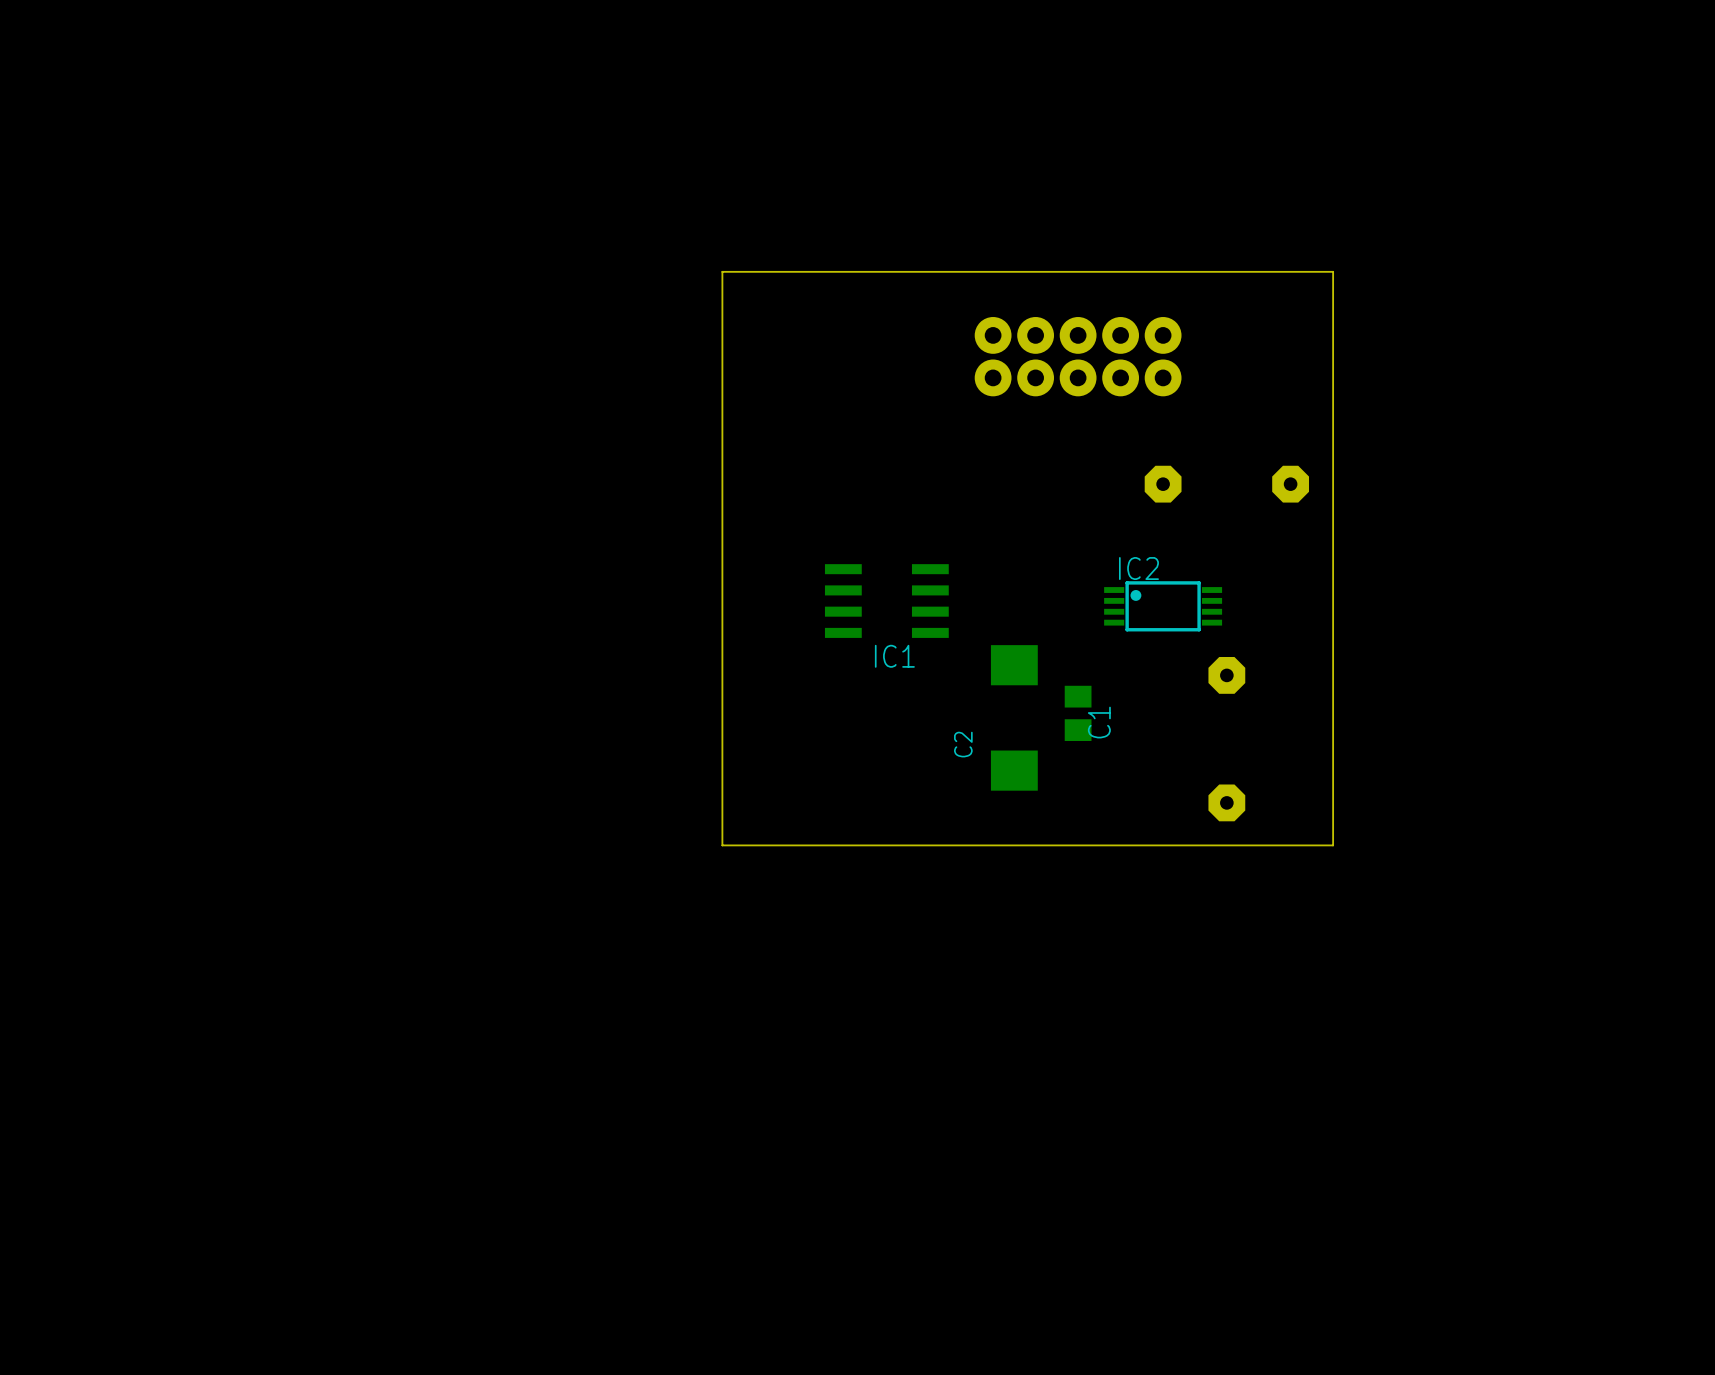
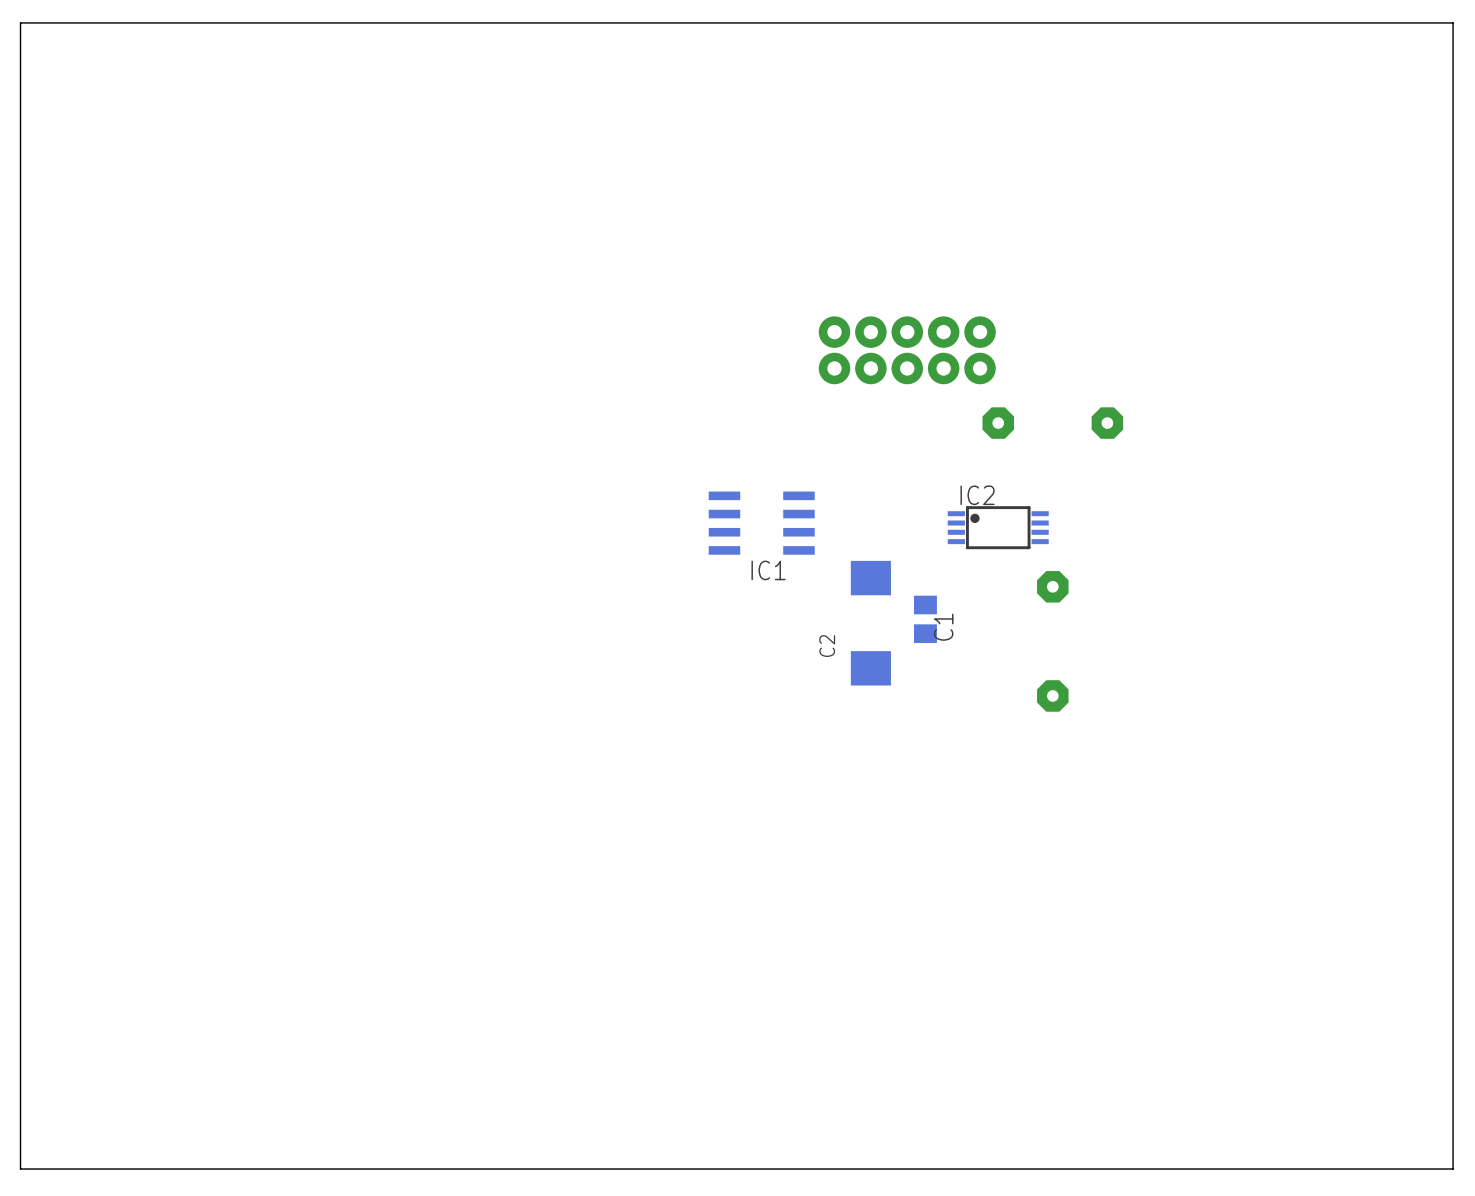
board edge: none -> (1453, 22) (20, 22) (20, 1169) (1453, 1169) (1453, 22)
board edge: (1333, 271) (722, 271) (722, 845) (1333, 845) (1333, 271) -> none
part position: (1078, 356) -> (907, 350)

